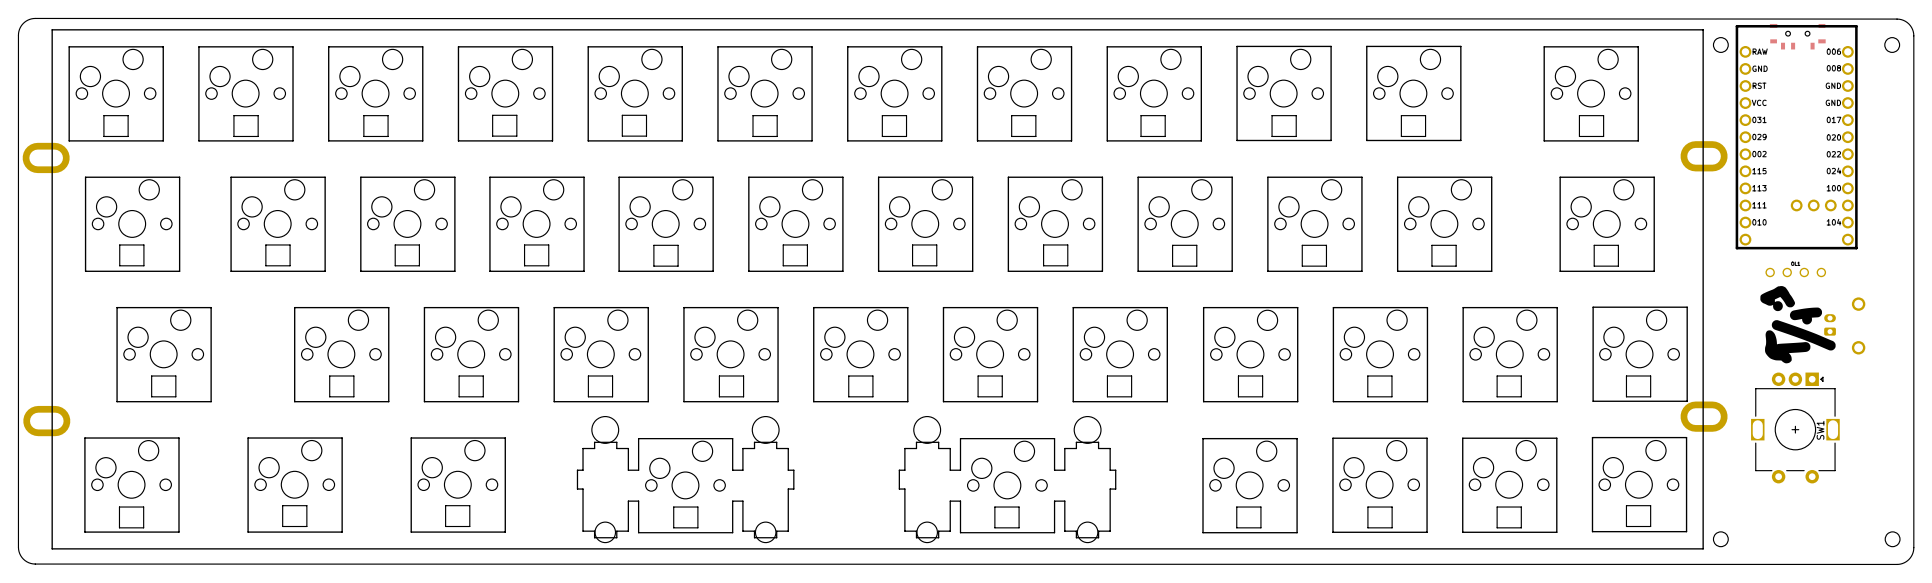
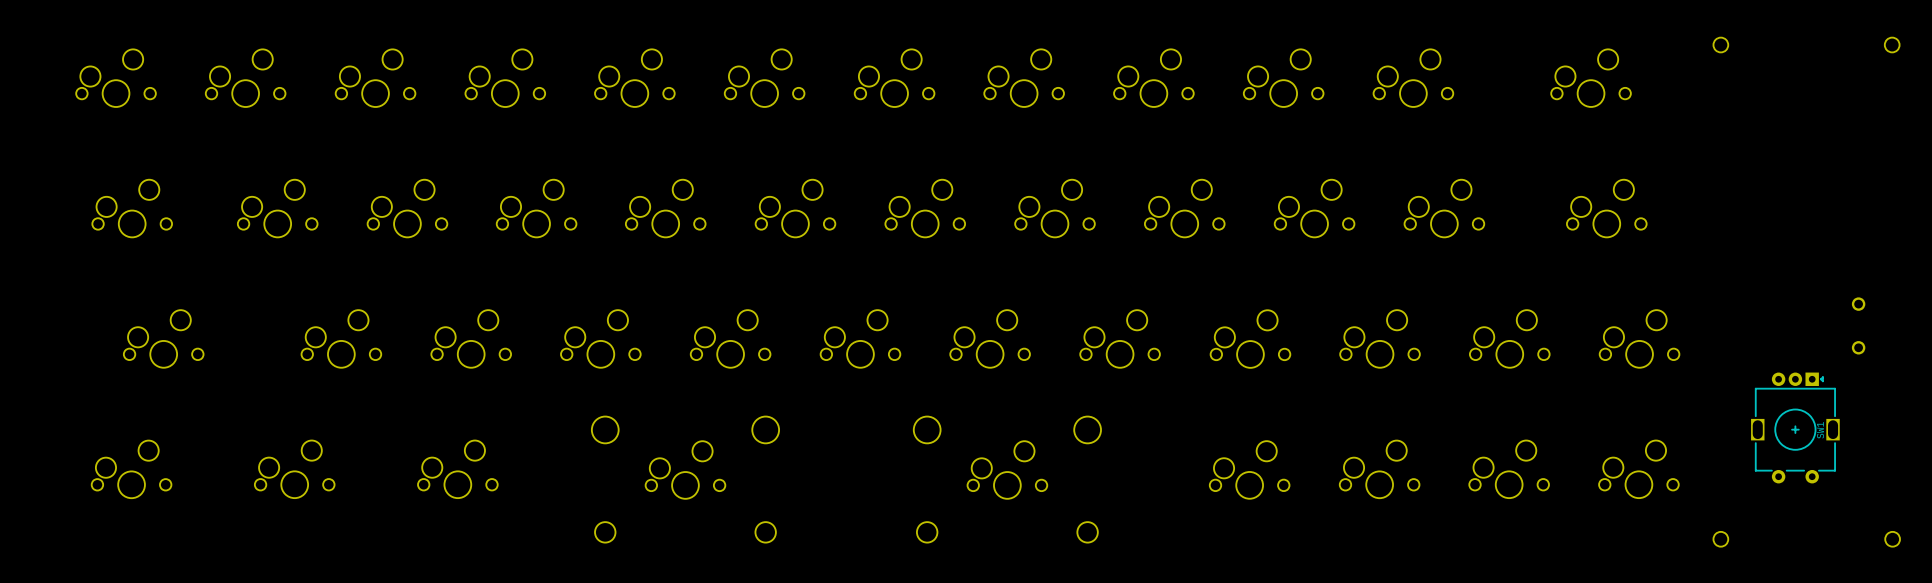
board edge: (35, 18) (1901, 19) (1910, 25) (1913, 35) (1913, 551) (1907, 560) (1897, 564) (30, 563) (21, 557) (18, 547) (18, 35) (23, 23) (35, 18) -> none
line: (52, 29) (1703, 29) (1703, 548) (52, 548) (52, 29) -> none
part: (1797, 36) -> none
line: (69, 46) (163, 46) (163, 140) (69, 140) (69, 46) -> none
line: (198, 46) (293, 46) (293, 140) (198, 140) (198, 46) -> none
line: (328, 46) (422, 46) (422, 140) (328, 140) (328, 46) -> none
line: (458, 46) (552, 46) (552, 140) (458, 140) (458, 46) -> none
line: (588, 46) (588, 140) (682, 140) (682, 46) (588, 46) -> none
line: (717, 46) (812, 46) (812, 140) (717, 140) (717, 46) -> none
line: (847, 46) (941, 46) (941, 140) (847, 140) (847, 46) -> none
line: (977, 46) (1071, 46) (1071, 140) (977, 140) (977, 46) -> none
line: (1107, 46) (1201, 46) (1201, 140) (1107, 140) (1107, 46) -> none
line: (1237, 46) (1331, 46) (1331, 140) (1237, 140) (1237, 46) -> none
line: (1366, 46) (1460, 46) (1460, 140) (1366, 140) (1366, 46) -> none
line: (1544, 46) (1638, 46) (1638, 140) (1544, 140) (1544, 46) -> none
part: (504, 125) -> none
part: (634, 125) -> none
part: (116, 126) -> none
part: (246, 126) -> none
part: (375, 126) -> none
part: (765, 126) -> none
part: (894, 126) -> none
part: (1023, 126) -> none
part: (1153, 126) -> none
part: (1284, 126) -> none
part: (1413, 126) -> none
part: (1591, 126) -> none
part: (1796, 137) -> none
part: (1704, 156) -> none
part: (46, 157) -> none
line: (85, 177) (179, 177) (179, 271) (85, 271) (85, 177) -> none
line: (231, 177) (325, 177) (325, 271) (231, 271) (231, 177) -> none
line: (360, 177) (454, 177) (454, 271) (360, 271) (360, 177) -> none
line: (489, 177) (584, 177) (584, 271) (489, 271) (489, 177) -> none
line: (619, 177) (713, 177) (713, 271) (619, 271) (619, 177) -> none
line: (748, 177) (842, 177) (842, 271) (748, 271) (748, 177) -> none
line: (878, 177) (972, 177) (972, 271) (878, 271) (878, 177) -> none
line: (1008, 177) (1102, 177) (1102, 271) (1008, 271) (1008, 177) -> none
line: (1138, 177) (1232, 177) (1232, 271) (1138, 271) (1138, 177) -> none
line: (1267, 177) (1361, 177) (1361, 271) (1267, 271) (1267, 177) -> none
line: (1397, 177) (1491, 177) (1491, 271) (1397, 271) (1397, 177) -> none
line: (1560, 177) (1654, 177) (1654, 271) (1560, 271) (1560, 177) -> none
part: (131, 255) -> none
part: (277, 255) -> none
part: (407, 255) -> none
part: (536, 255) -> none
part: (665, 255) -> none
part: (795, 255) -> none
part: (924, 255) -> none
part: (1055, 255) -> none
part: (1184, 255) -> none
part: (1314, 255) -> none
part: (1444, 255) -> none
part: (1606, 255) -> none
part: (1795, 272) -> none
drawing: [1760, 286, 1836, 364] -> none
line: (117, 307) (211, 307) (211, 401) (117, 401) (117, 307) -> none
line: (294, 307) (388, 307) (388, 401) (294, 401) (294, 307) -> none
line: (424, 307) (518, 307) (518, 401) (424, 401) (424, 307) -> none
line: (554, 307) (648, 307) (648, 401) (554, 401) (554, 307) -> none
line: (683, 307) (683, 401) (778, 401) (778, 307) (683, 307) -> none
line: (813, 307) (907, 307) (907, 401) (813, 401) (813, 307) -> none
line: (943, 307) (1037, 307) (1037, 401) (943, 401) (943, 307) -> none
line: (1073, 307) (1167, 307) (1167, 401) (1073, 401) (1073, 307) -> none
line: (1203, 307) (1297, 307) (1297, 401) (1203, 401) (1203, 307) -> none
line: (1333, 307) (1333, 401) (1427, 401) (1427, 307) (1333, 307) -> none
line: (1463, 307) (1557, 307) (1557, 401) (1463, 401) (1463, 307) -> none
line: (1593, 307) (1593, 401) (1687, 401) (1687, 307) (1593, 307) -> none
part: (1830, 324) -> none
part: (163, 386) -> none
part: (341, 386) -> none
part: (471, 386) -> none
part: (600, 386) -> none
part: (731, 386) -> none
part: (860, 386) -> none
part: (990, 386) -> none
part: (1119, 386) -> none
part: (1250, 386) -> none
part: (1379, 386) -> none
part: (1509, 386) -> none
part: (1638, 386) -> none
part: (1704, 416) -> none
part: (46, 421) -> none
line: (1592, 437) (1686, 437) (1686, 531) (1592, 531) (1592, 437) -> none
line: (84, 438) (178, 438) (178, 532) (84, 532) (84, 438) -> none
line: (248, 438) (342, 438) (342, 532) (248, 532) (248, 438) -> none
line: (411, 438) (505, 438) (505, 532) (411, 532) (411, 438) -> none
line: (638, 438) (732, 438) (732, 470) (742, 470) (742, 448) (754, 448) (754, 442) (776, 442) (776, 448) (788, 448) (788, 470) (793, 470) (793, 489) (788, 489) (788, 531) (776, 531) (776, 537) (754, 537) (754, 531) (742, 531) (742, 501) (732, 501) (732, 532) (638, 532) (638, 501) (628, 501) (628, 531) (616, 531) (616, 537) (594, 537) (594, 531) (583, 531) (583, 489) (577, 489) (577, 470) (583, 470) (583, 448) (594, 448) (594, 442) (616, 442) (616, 448) (628, 448) (628, 470) (638, 470) (638, 438) -> none
line: (960, 438) (960, 470) (950, 470) (950, 448) (938, 448) (938, 442) (916, 442) (916, 448) (904, 448) (904, 470) (899, 470) (899, 489) (904, 489) (904, 531) (916, 531) (916, 537) (938, 537) (938, 531) (950, 531) (950, 501) (960, 501) (960, 532) (1054, 532) (1054, 501) (1064, 501) (1064, 531) (1076, 531) (1076, 537) (1098, 537) (1098, 531) (1110, 531) (1110, 489) (1115, 489) (1115, 470) (1110, 470) (1110, 448) (1098, 448) (1098, 442) (1076, 442) (1076, 448) (1064, 448) (1064, 470) (1054, 470) (1054, 438) (960, 438) -> none
line: (1203, 438) (1203, 532) (1297, 532) (1297, 438) (1203, 438) -> none
line: (1332, 438) (1427, 438) (1427, 532) (1332, 532) (1332, 438) -> none
line: (1462, 438) (1556, 438) (1556, 532) (1462, 532) (1462, 438) -> none
part: (294, 516) -> none
part: (457, 516) -> none
part: (1638, 516) -> none
part: (131, 517) -> none
part: (685, 517) -> none
part: (1006, 517) -> none
part: (1248, 517) -> none
part: (1380, 517) -> none
part: (1509, 517) -> none

